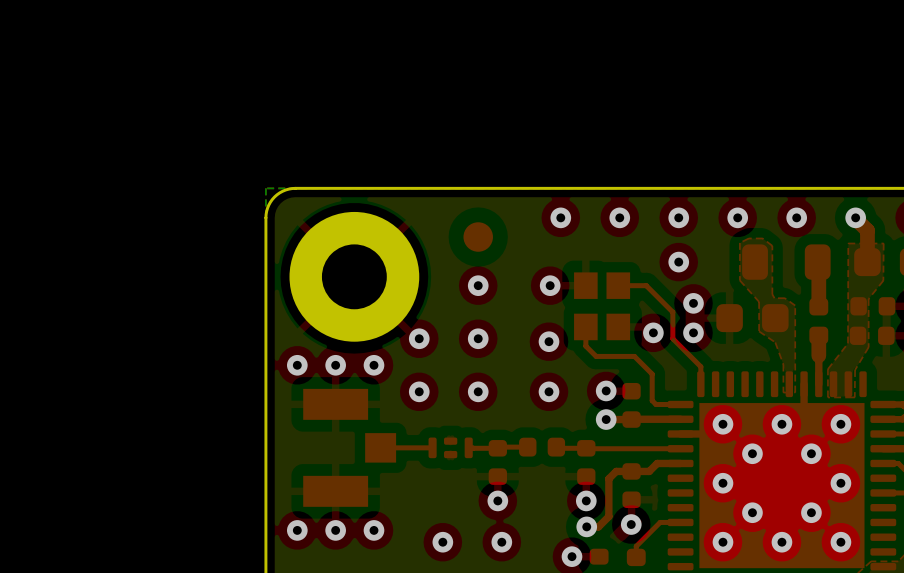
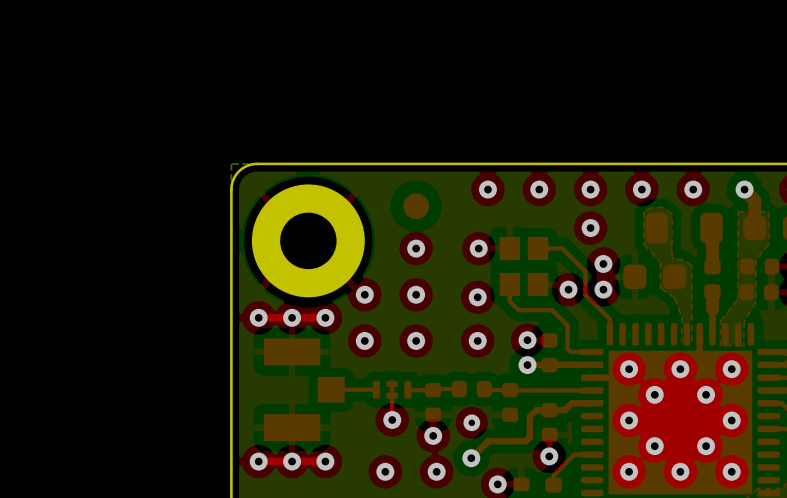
top track: none -> (325, 317) (258, 317)
top track: none -> (392, 383) (392, 419)
via: none -> (392, 419)
via: none -> (471, 422)
via: (586, 500) -> none
top track: (608, 502) (608, 516) (598, 526) (586, 526) -> (529, 437) (525, 441) (488, 441) (471, 458)
via: none -> (471, 458)
via: (586, 526) -> none
top track: none -> (325, 461) (258, 461)

